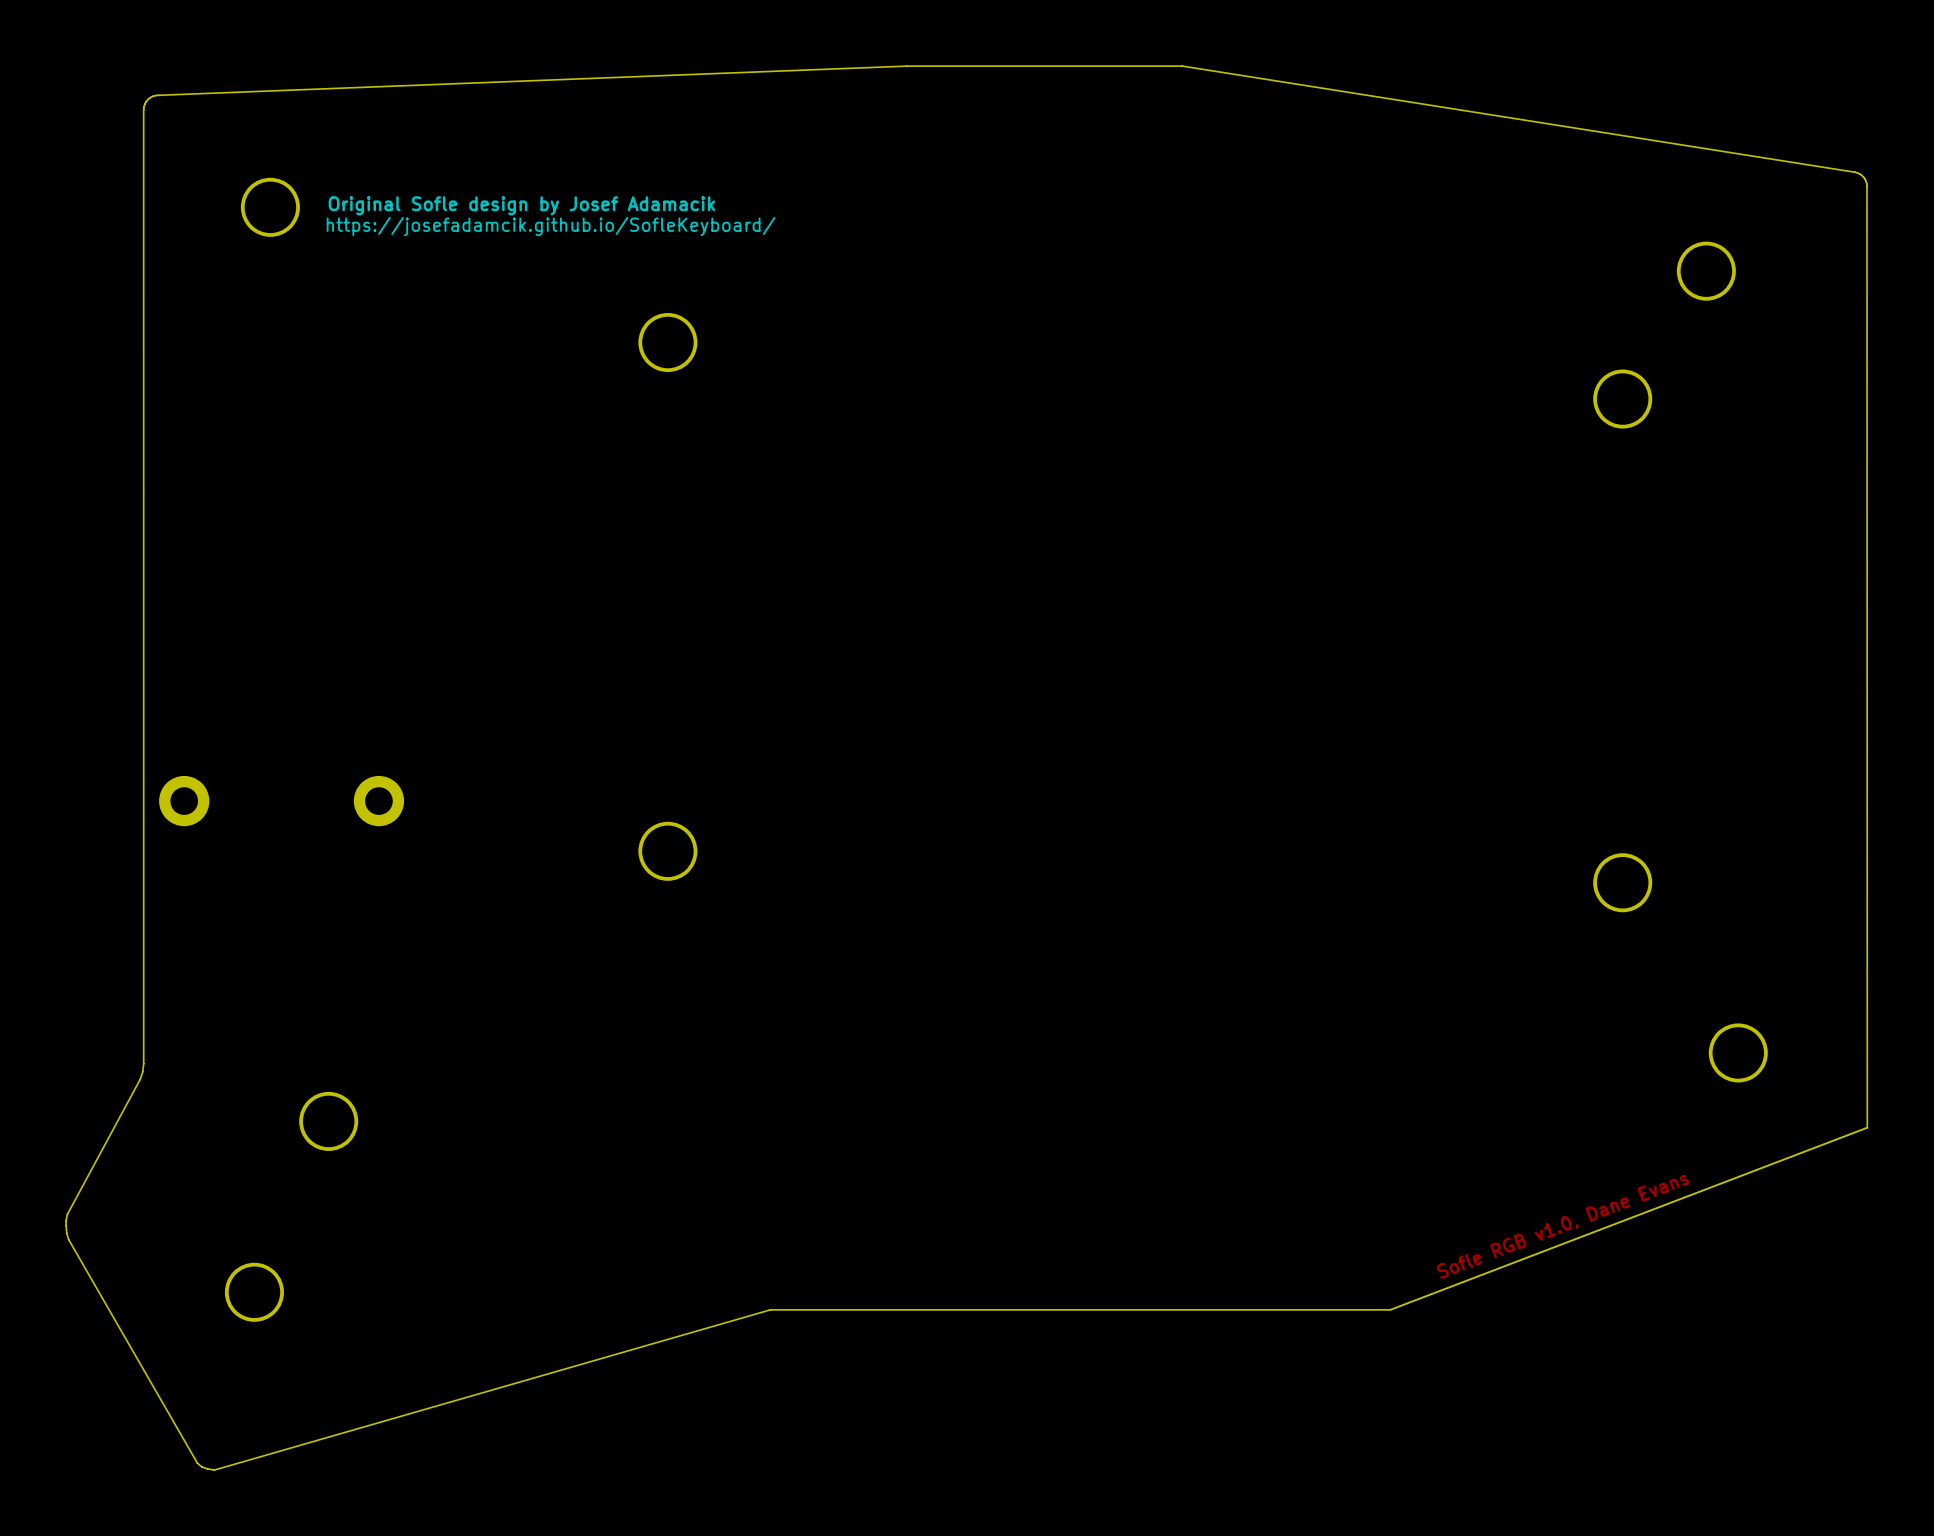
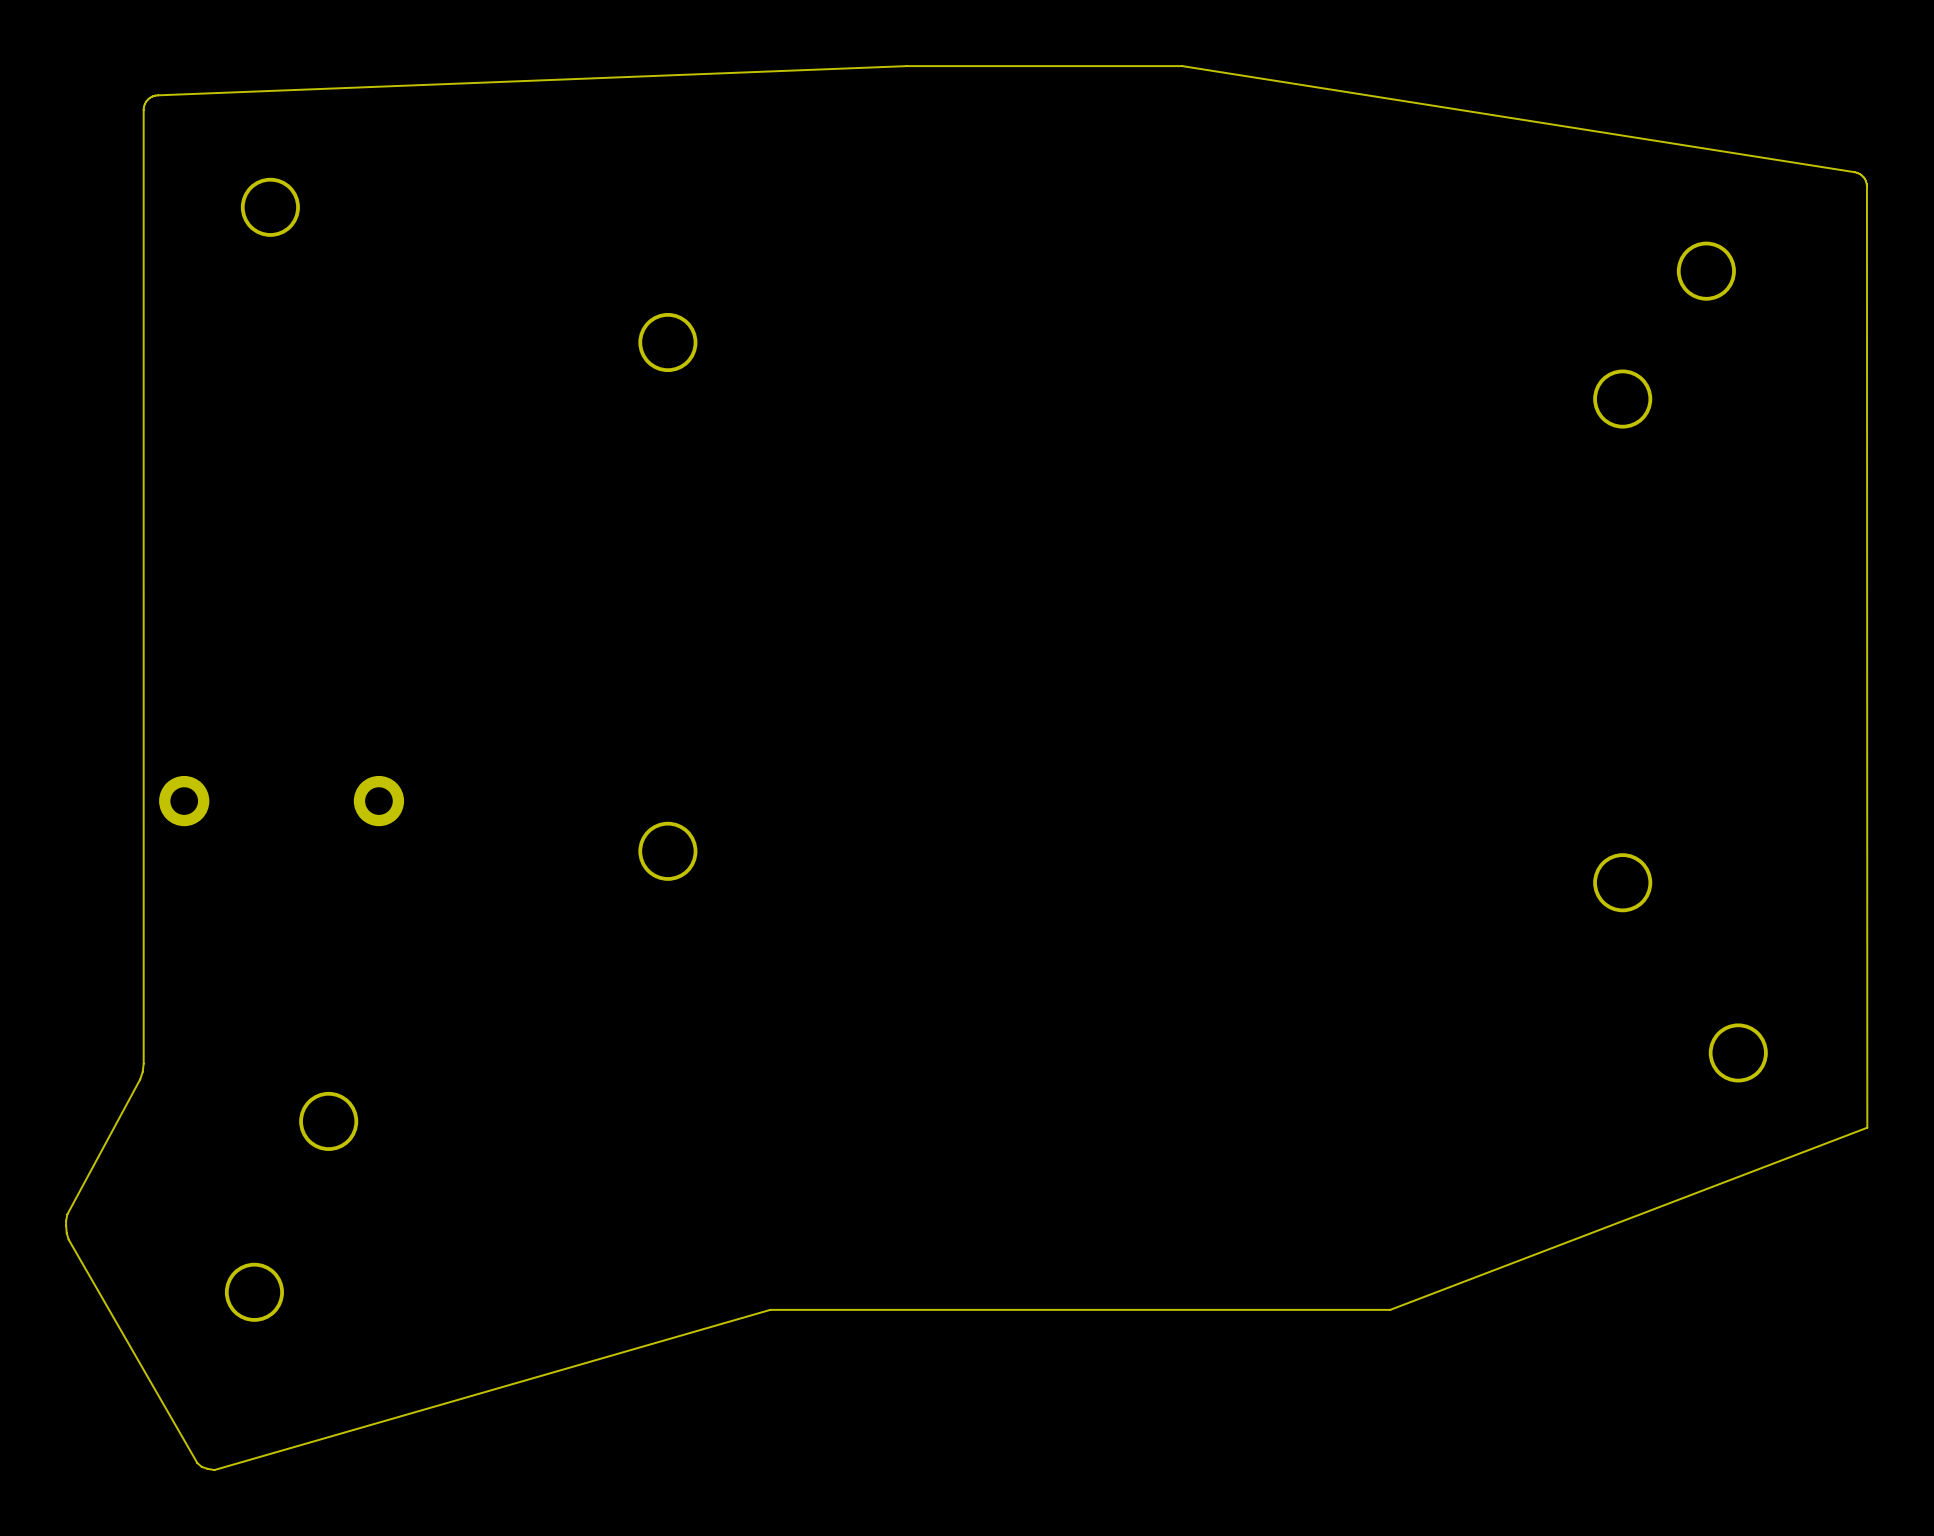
text: Original Sofle design by Josef Adamacik (521, 205) -> none
text: https://josefadamcik.github.io/SofleKeyboard/ (551, 226) -> none
text: Sofle RGB v1.0, Dane Evans (1562, 1226) -> none

